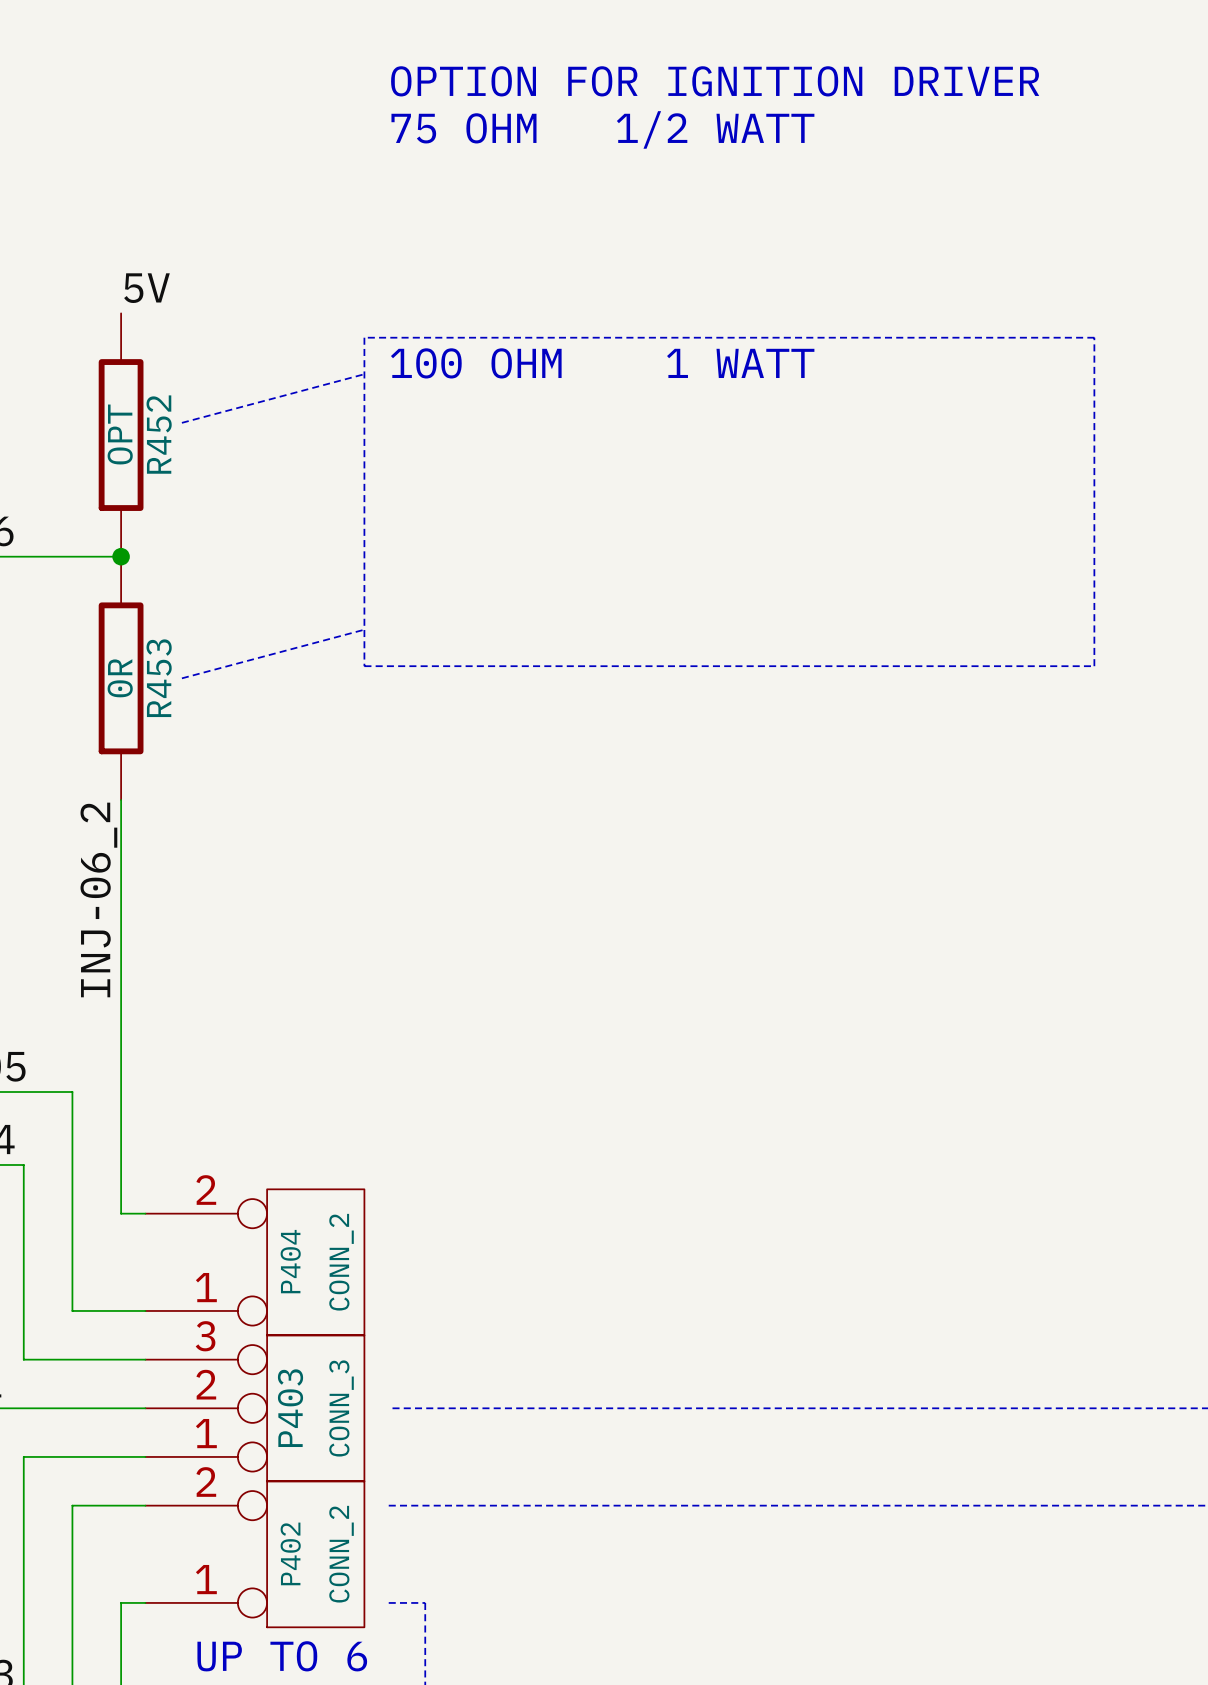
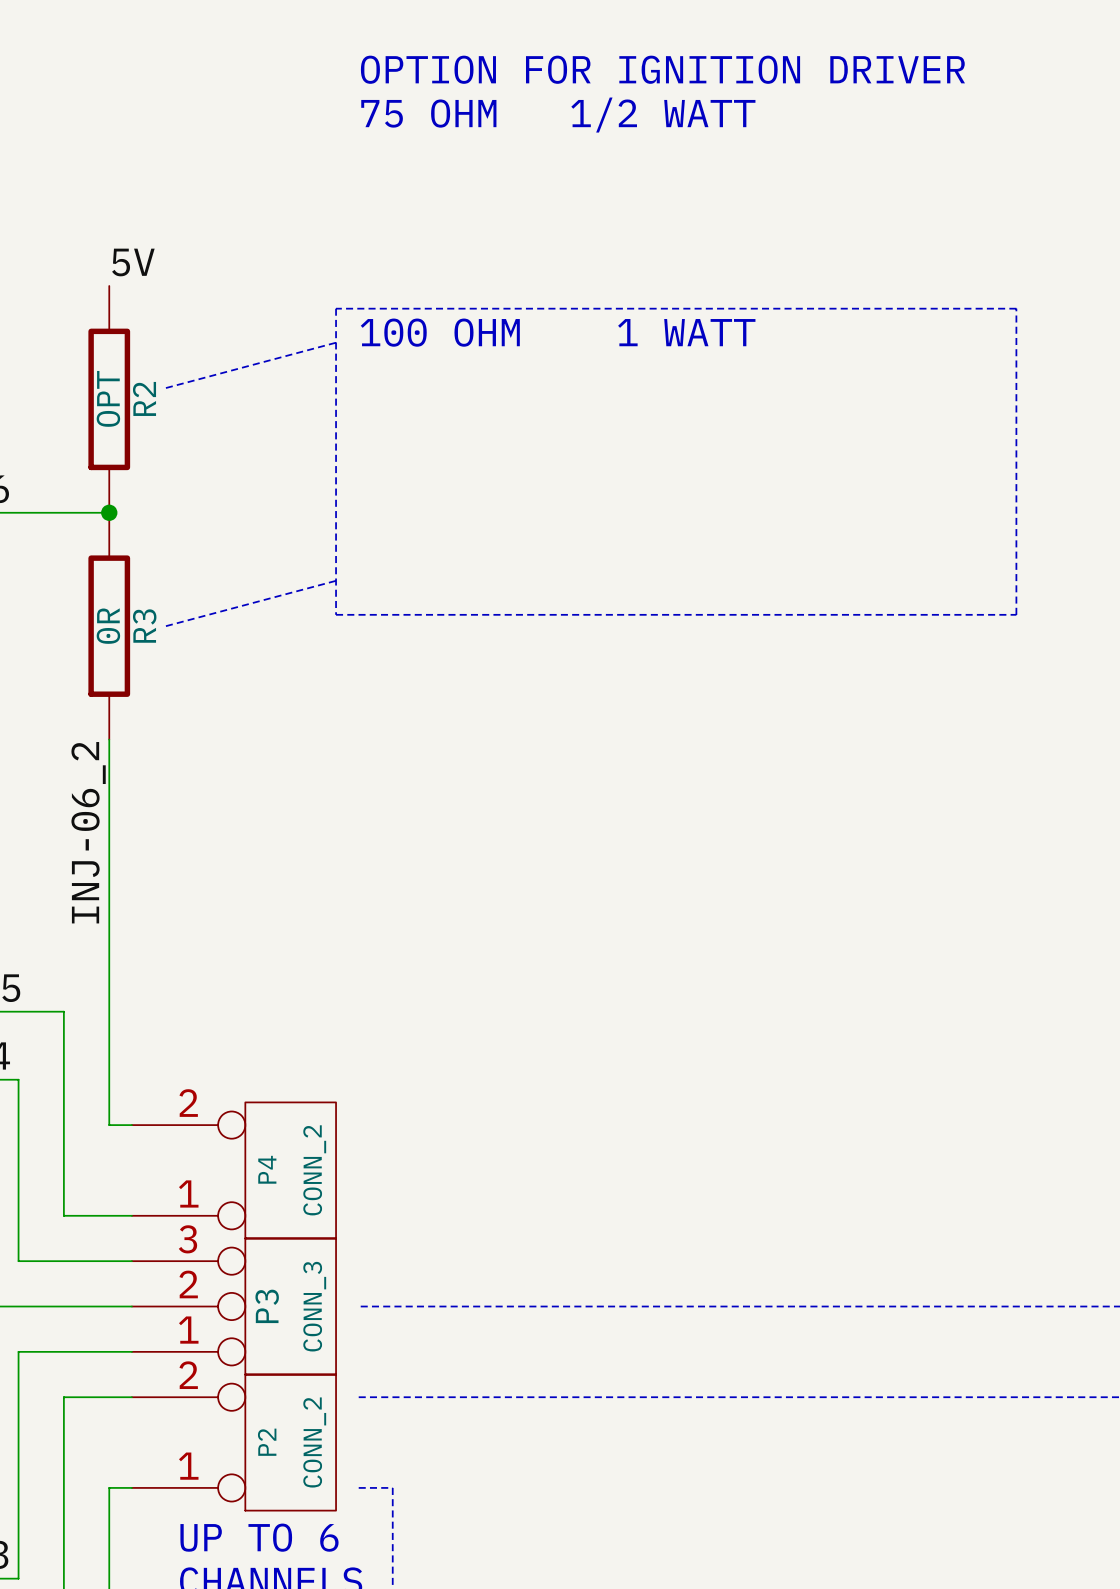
R452 name: R452 (159, 434) -> R2 (144, 398)
R453 name: R453 (159, 678) -> R3 (144, 626)
P404 name: P404 (290, 1261) -> P4 (267, 1169)
P403 name: P403 (290, 1408) -> P3 (267, 1306)
P402 name: P402 (290, 1553) -> P2 (267, 1442)

